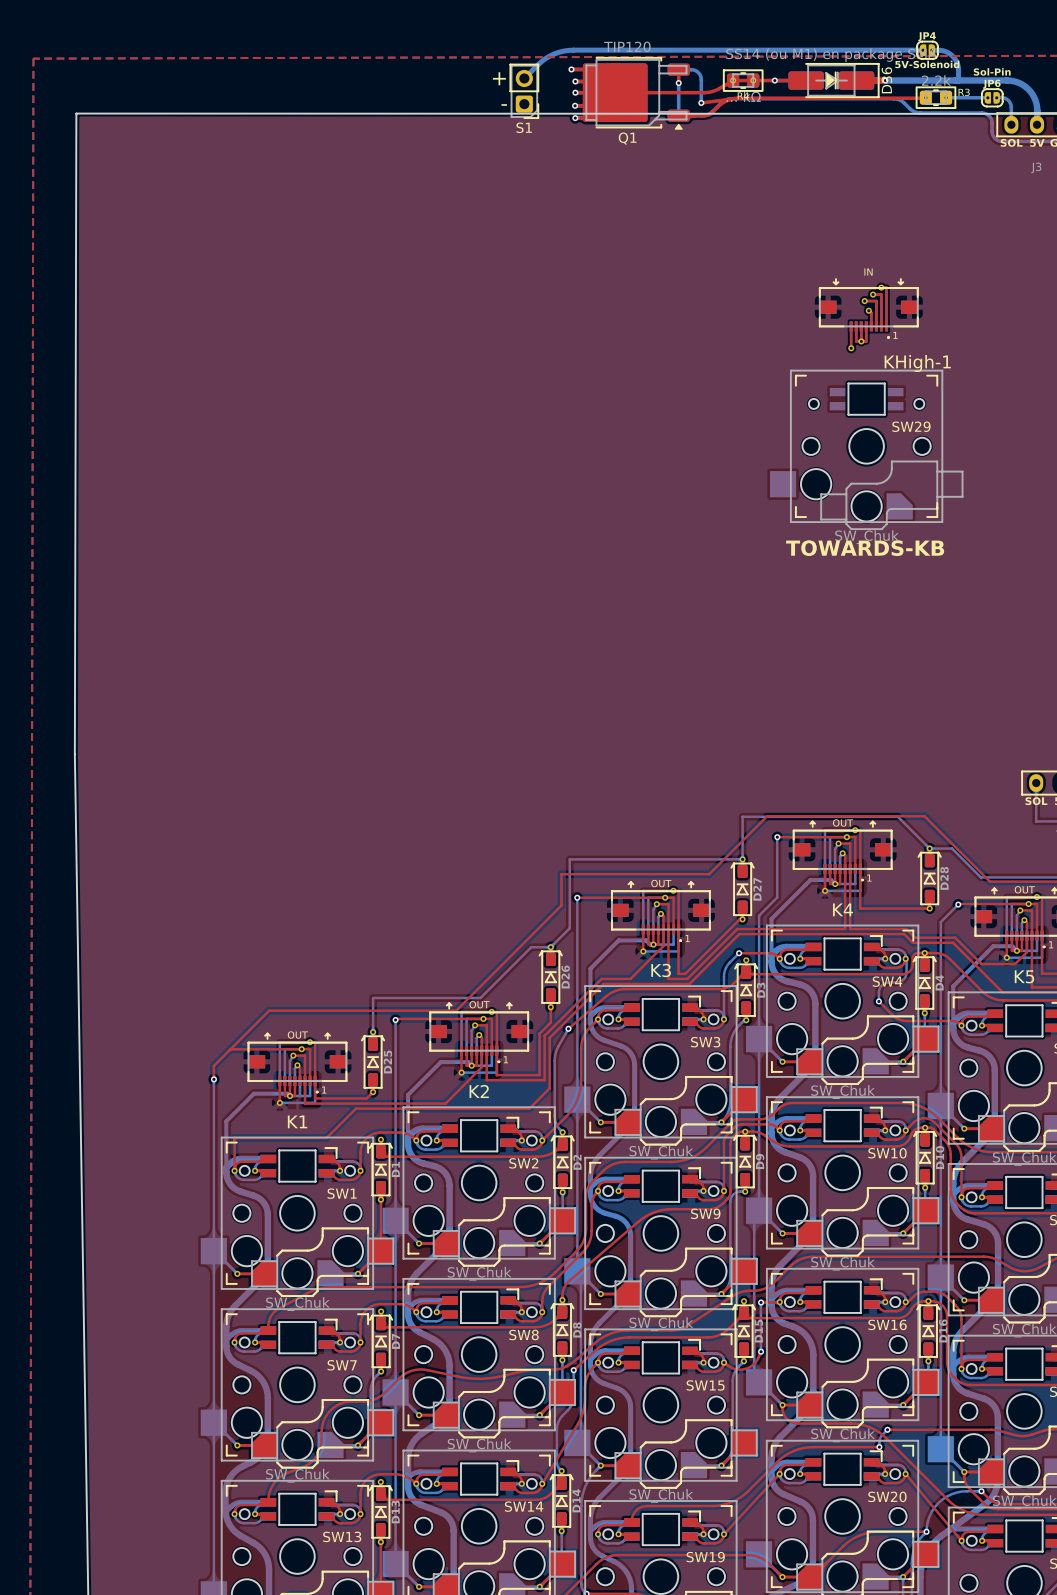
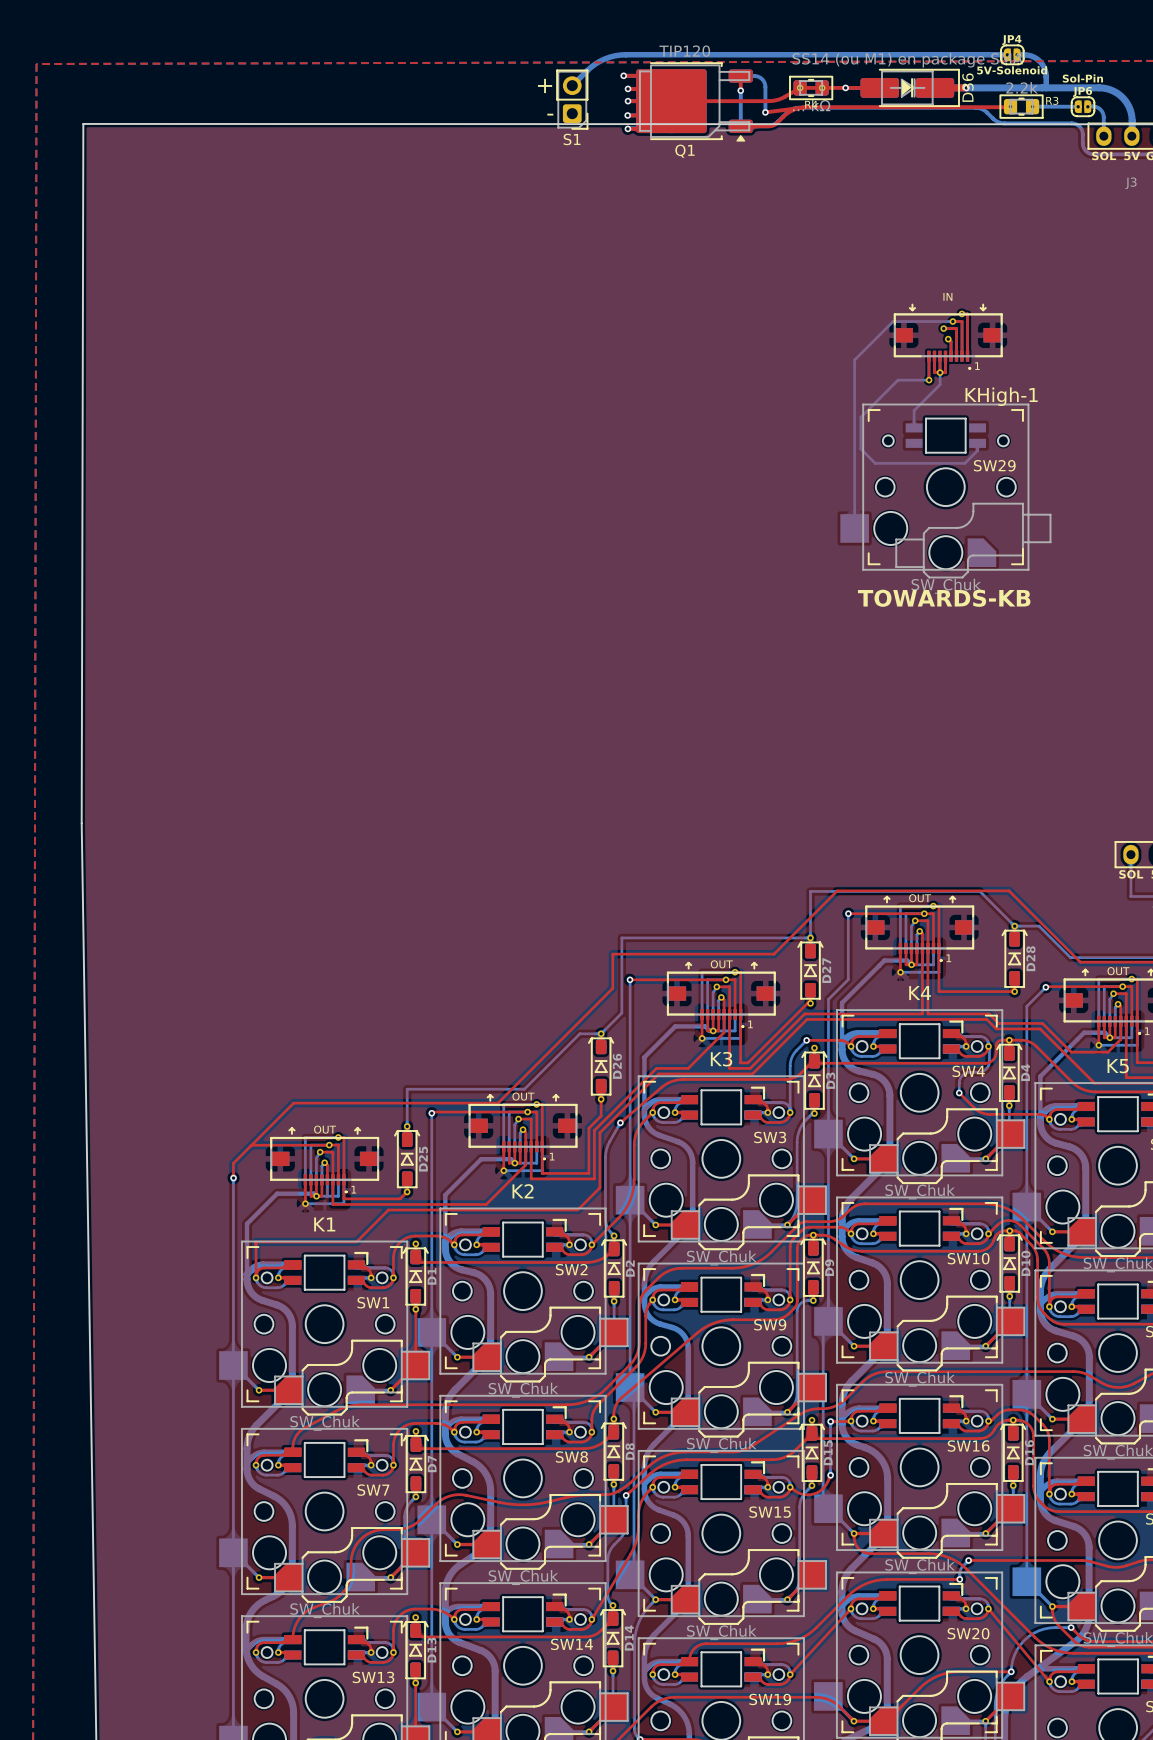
bottom track: none -> (952, 321) (893, 321) (854, 360) (854, 528)
bottom track: none -> (940, 372) (940, 384) (914, 410) (914, 427)
bottom track: none -> (929, 380) (898, 380) (860, 417) (860, 448) (875, 463) (964, 463) (977, 450) (977, 443)

